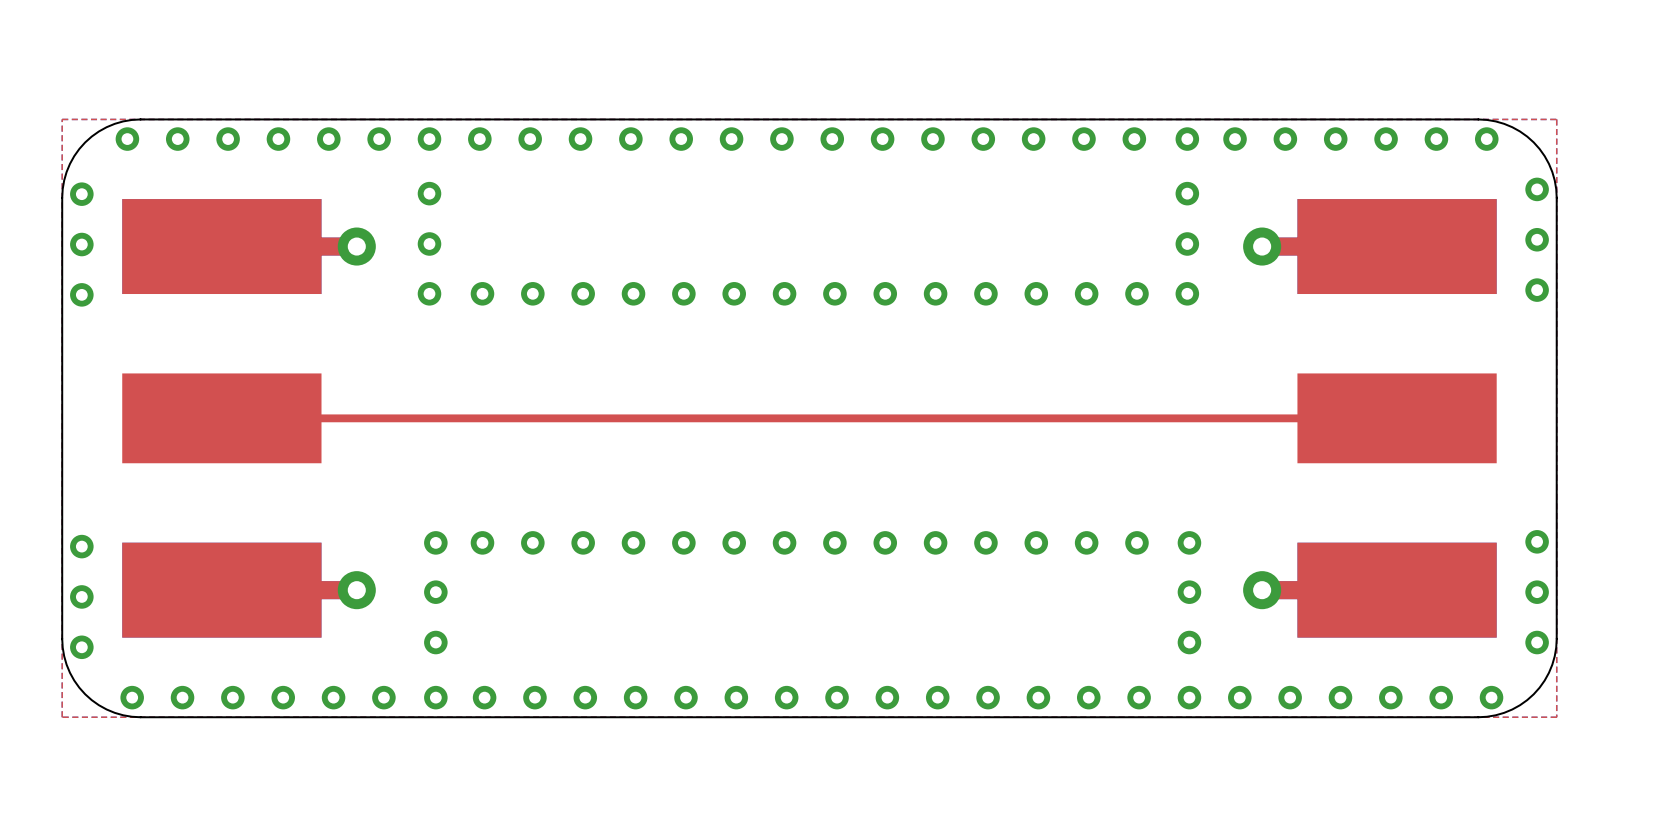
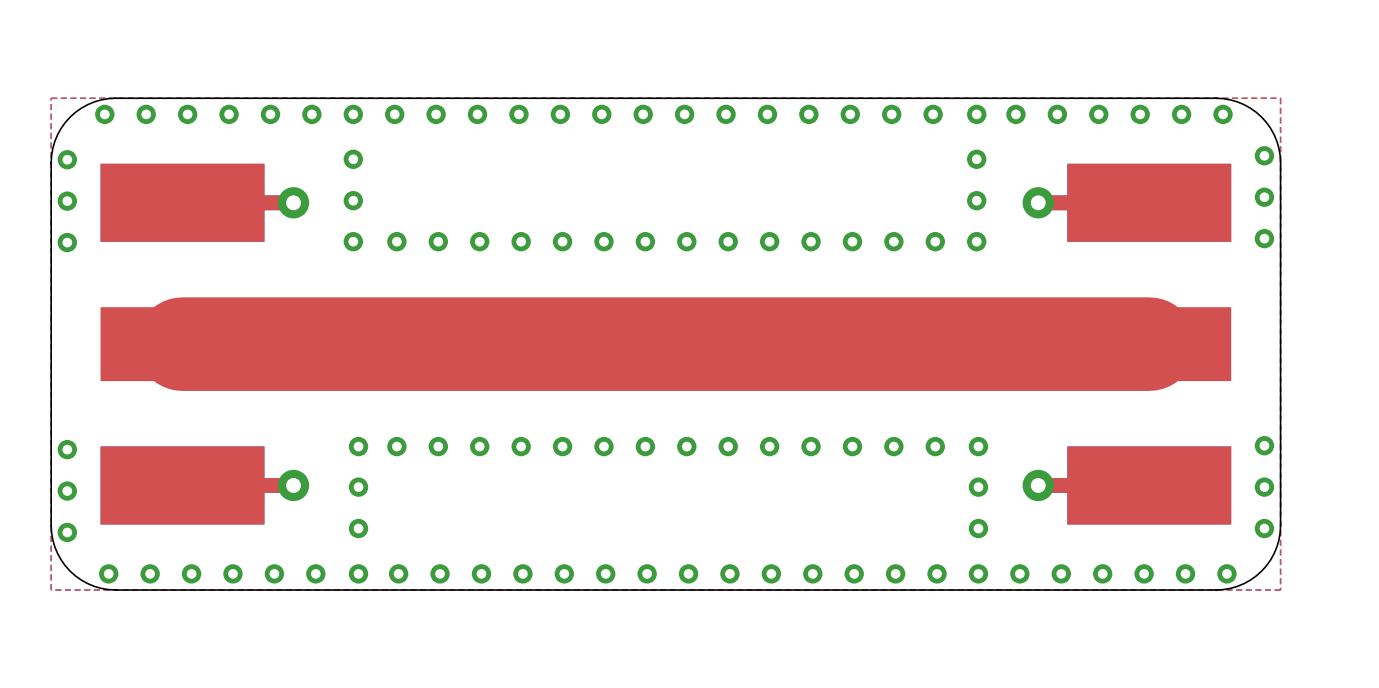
top track width: thin (221, 418) (1397, 418) -> thick (182, 344) (1149, 344)

